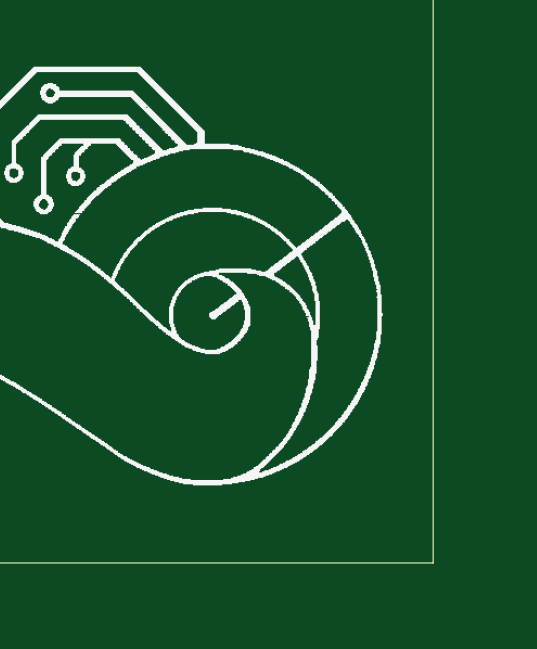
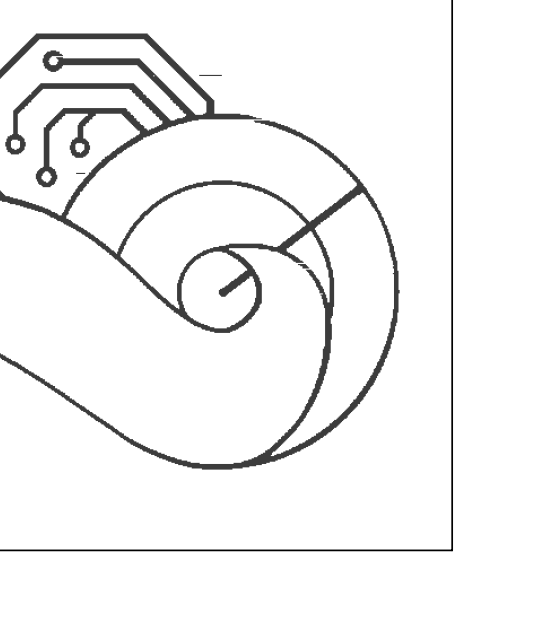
drawing: [50, 88, 60, 90] -> none
drawing position: (243, 149) -> (210, 75)
drawing: none -> [76, 172, 86, 188]
drawing: [285, 286, 298, 294] -> none

